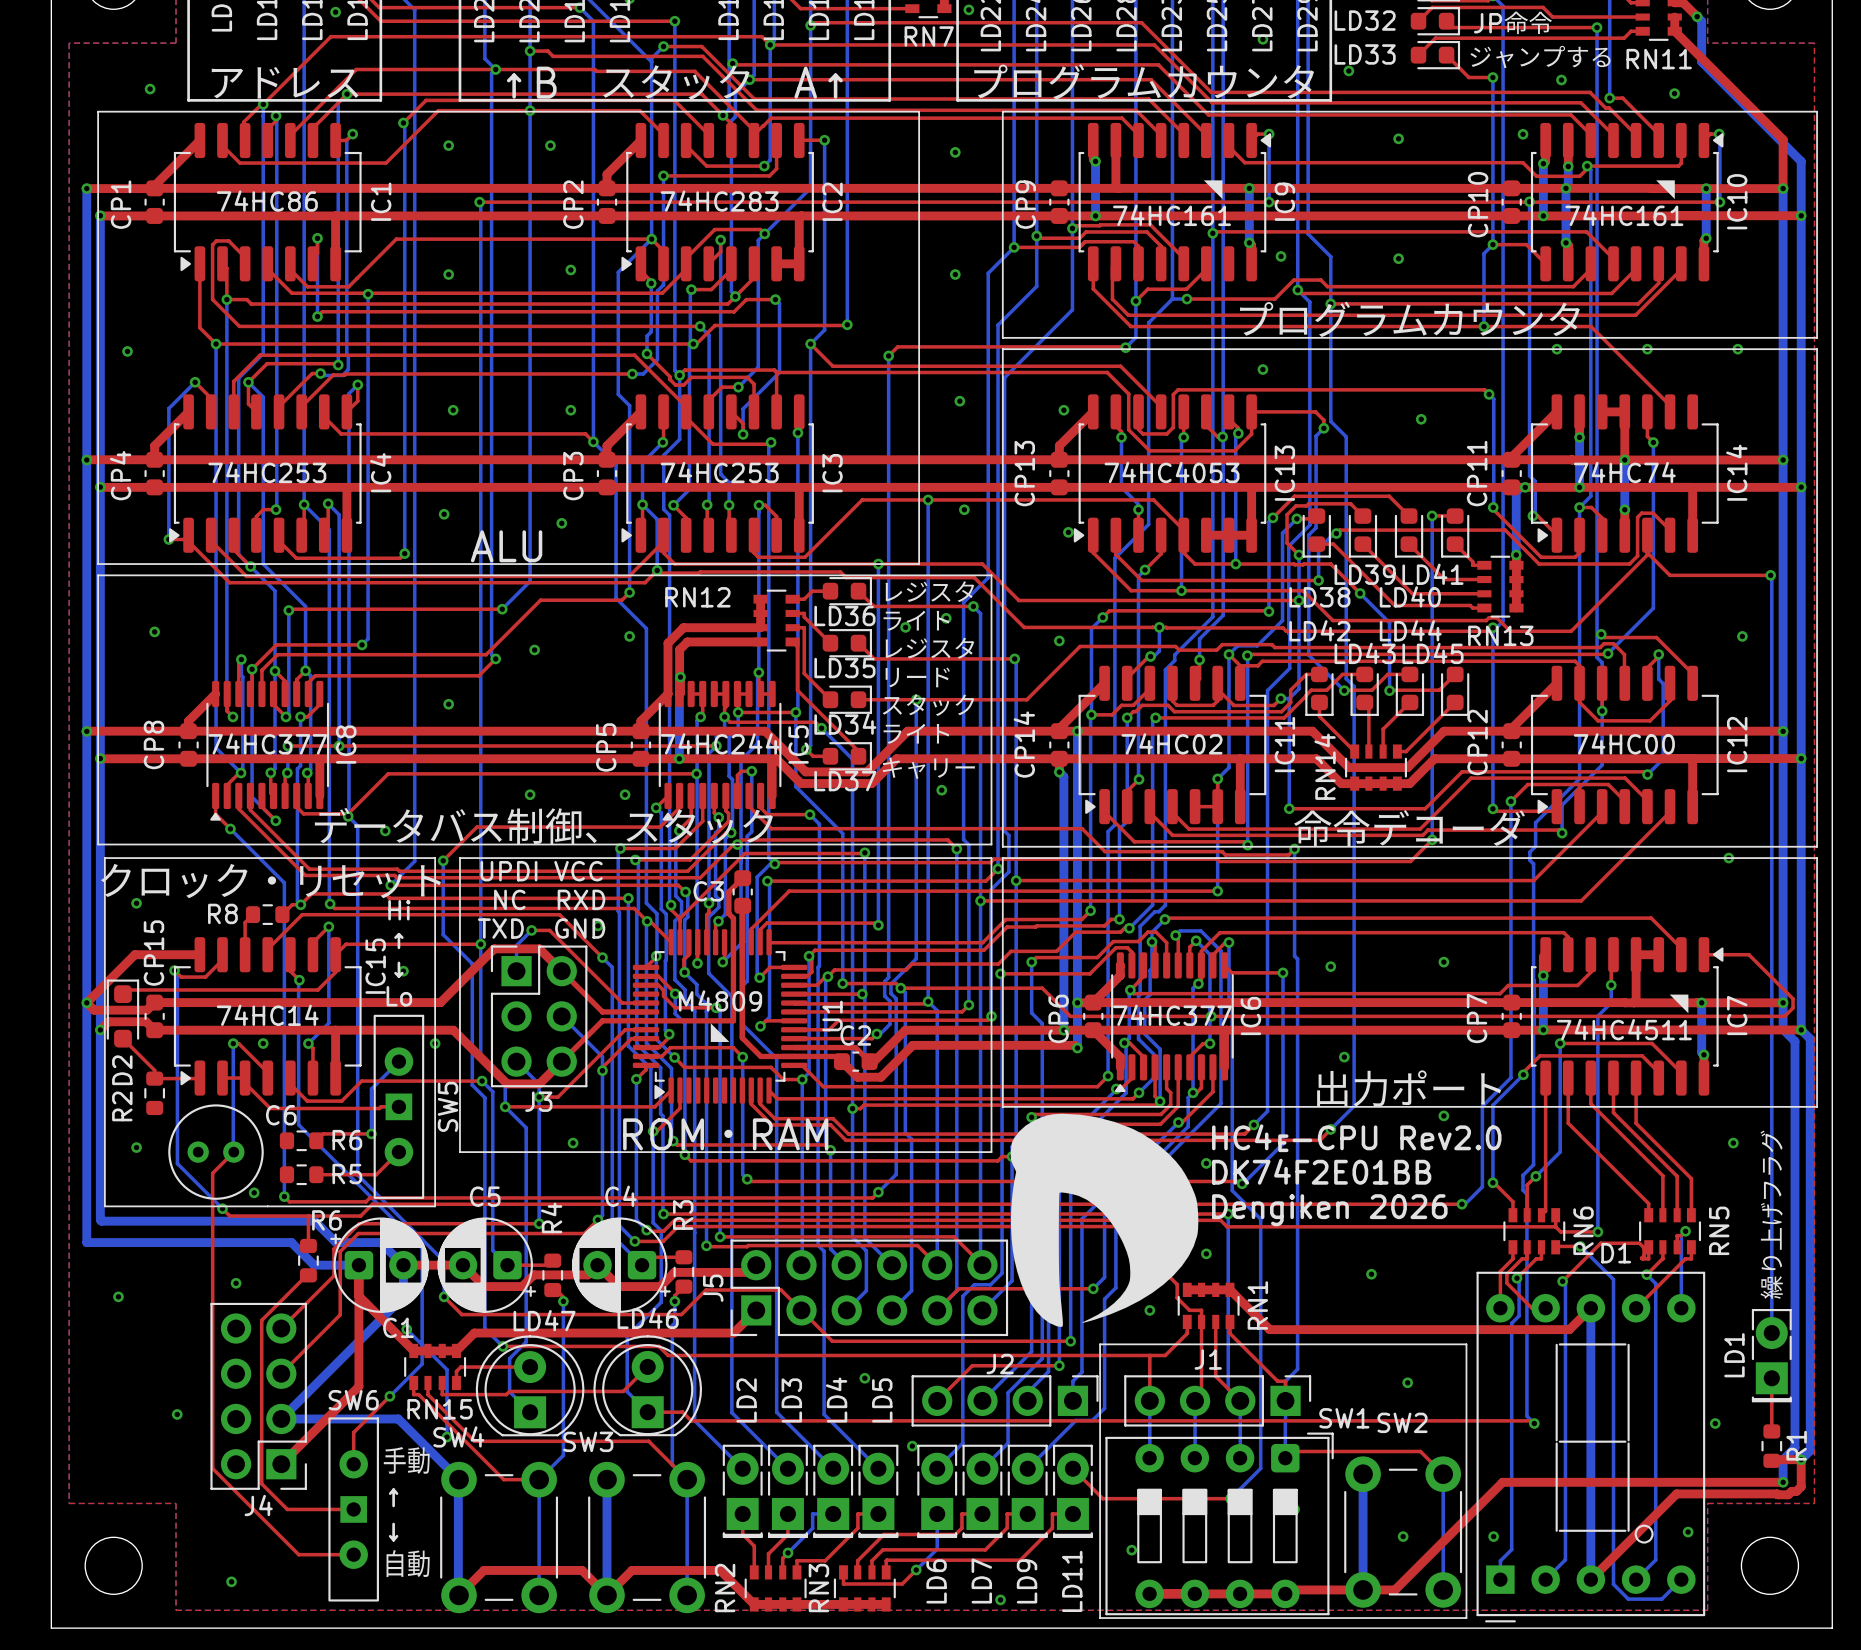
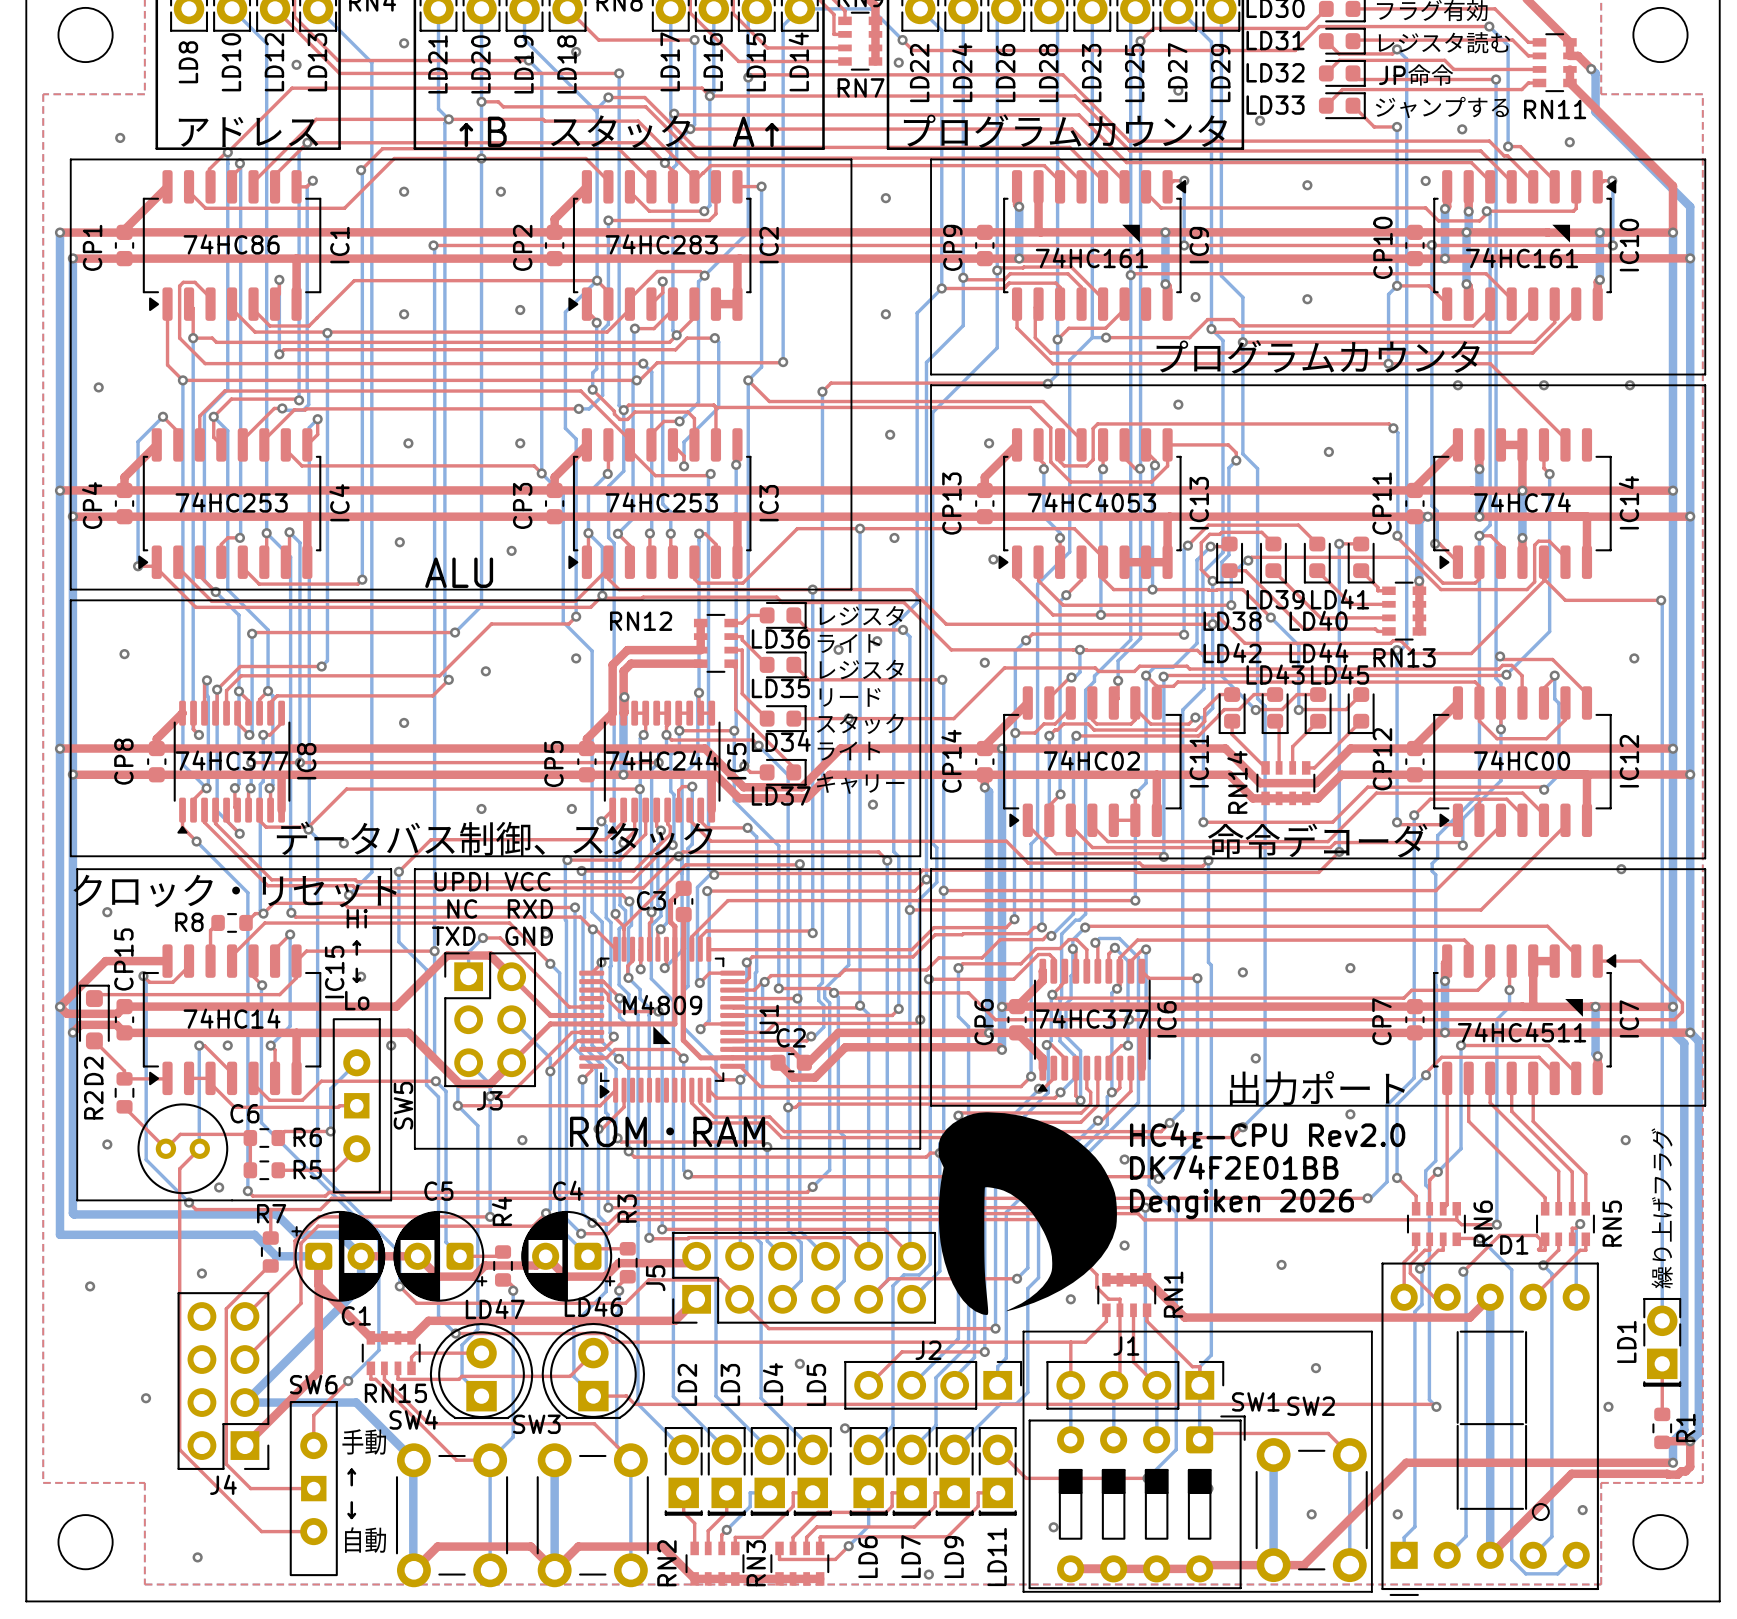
top track: none -> (124, 1106) (165, 1148) (180, 1134) (246, 1134) (250, 1138) (250, 1170)
R6 name: R6 (326, 1220) -> R7 (271, 1213)
bottom track: (406, 1329) (447, 1369) (447, 1437) -> none
via: (406, 1329) -> none
via: (447, 1437) -> none

